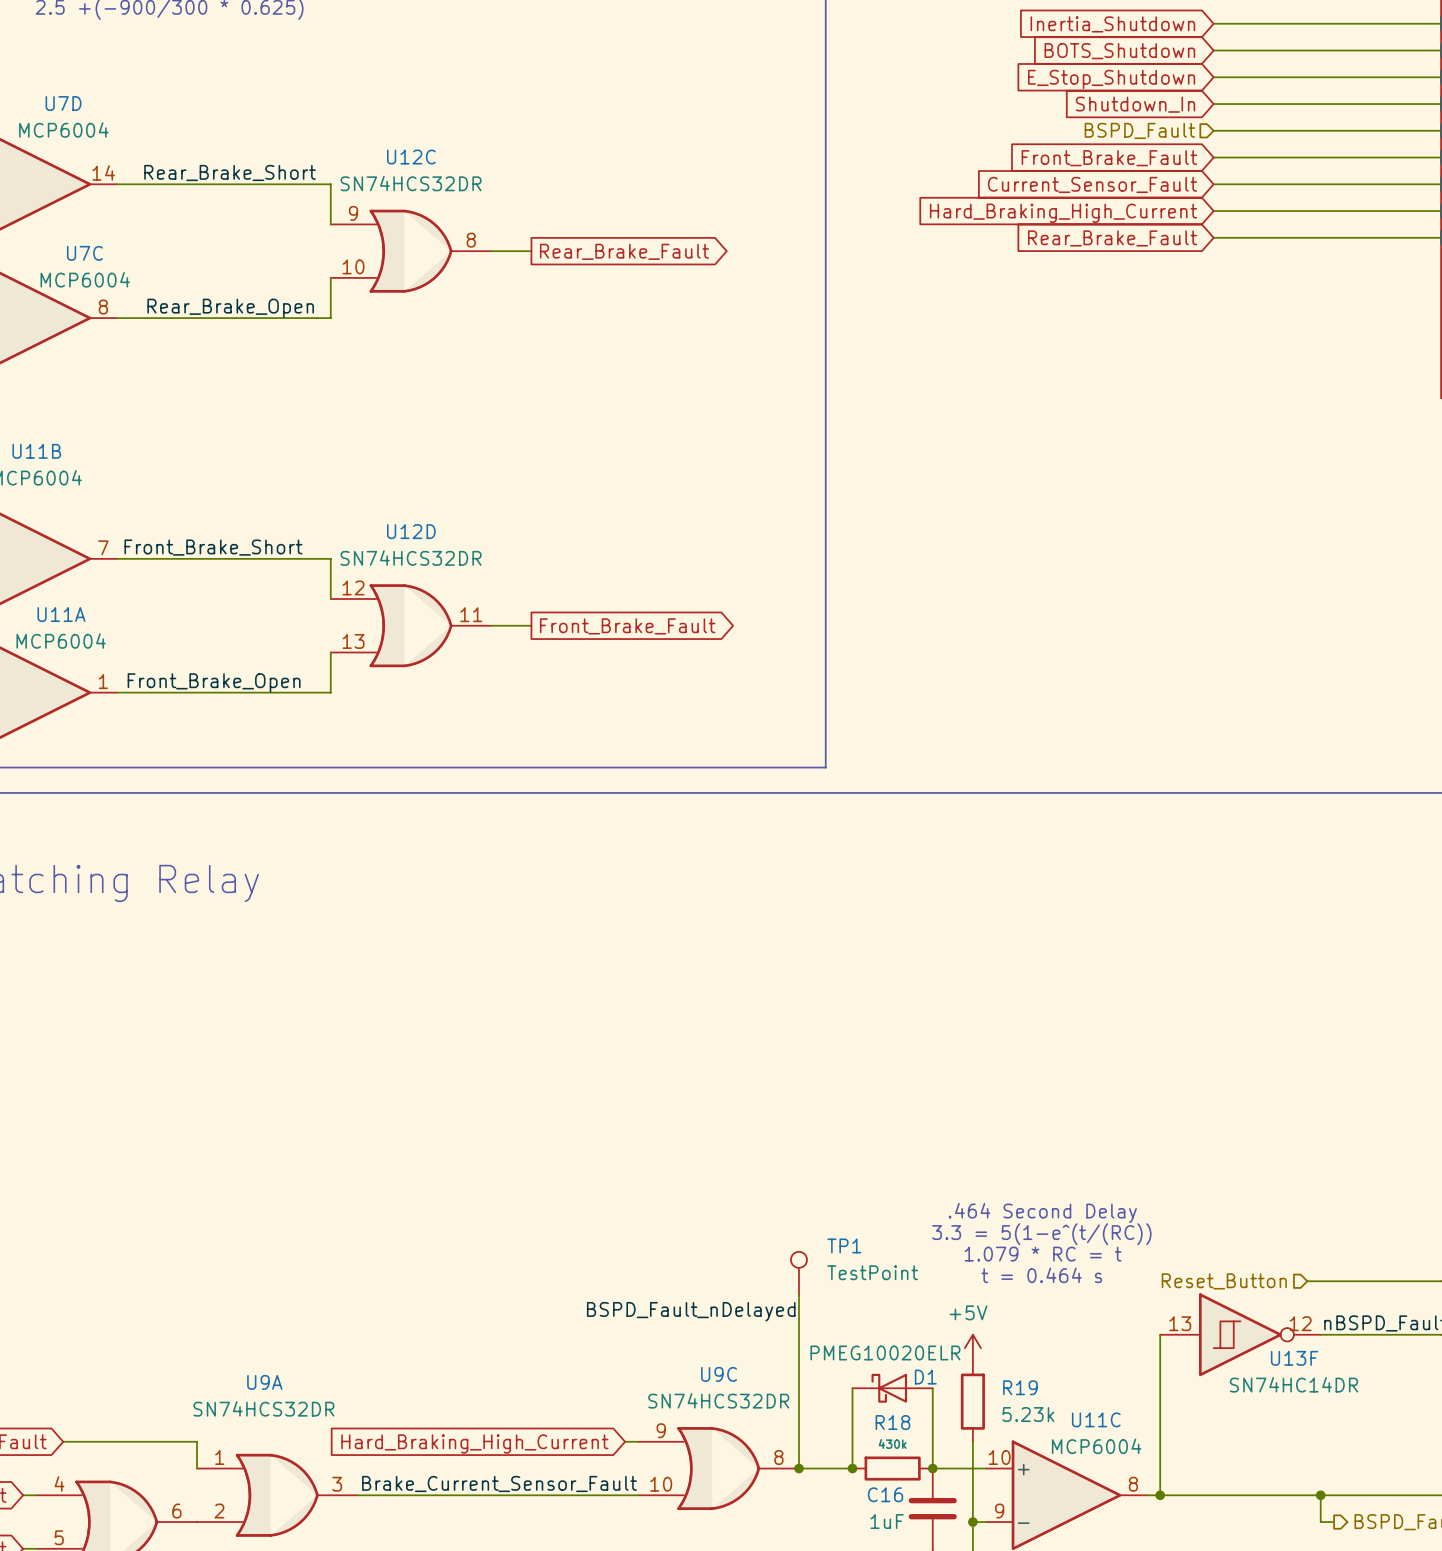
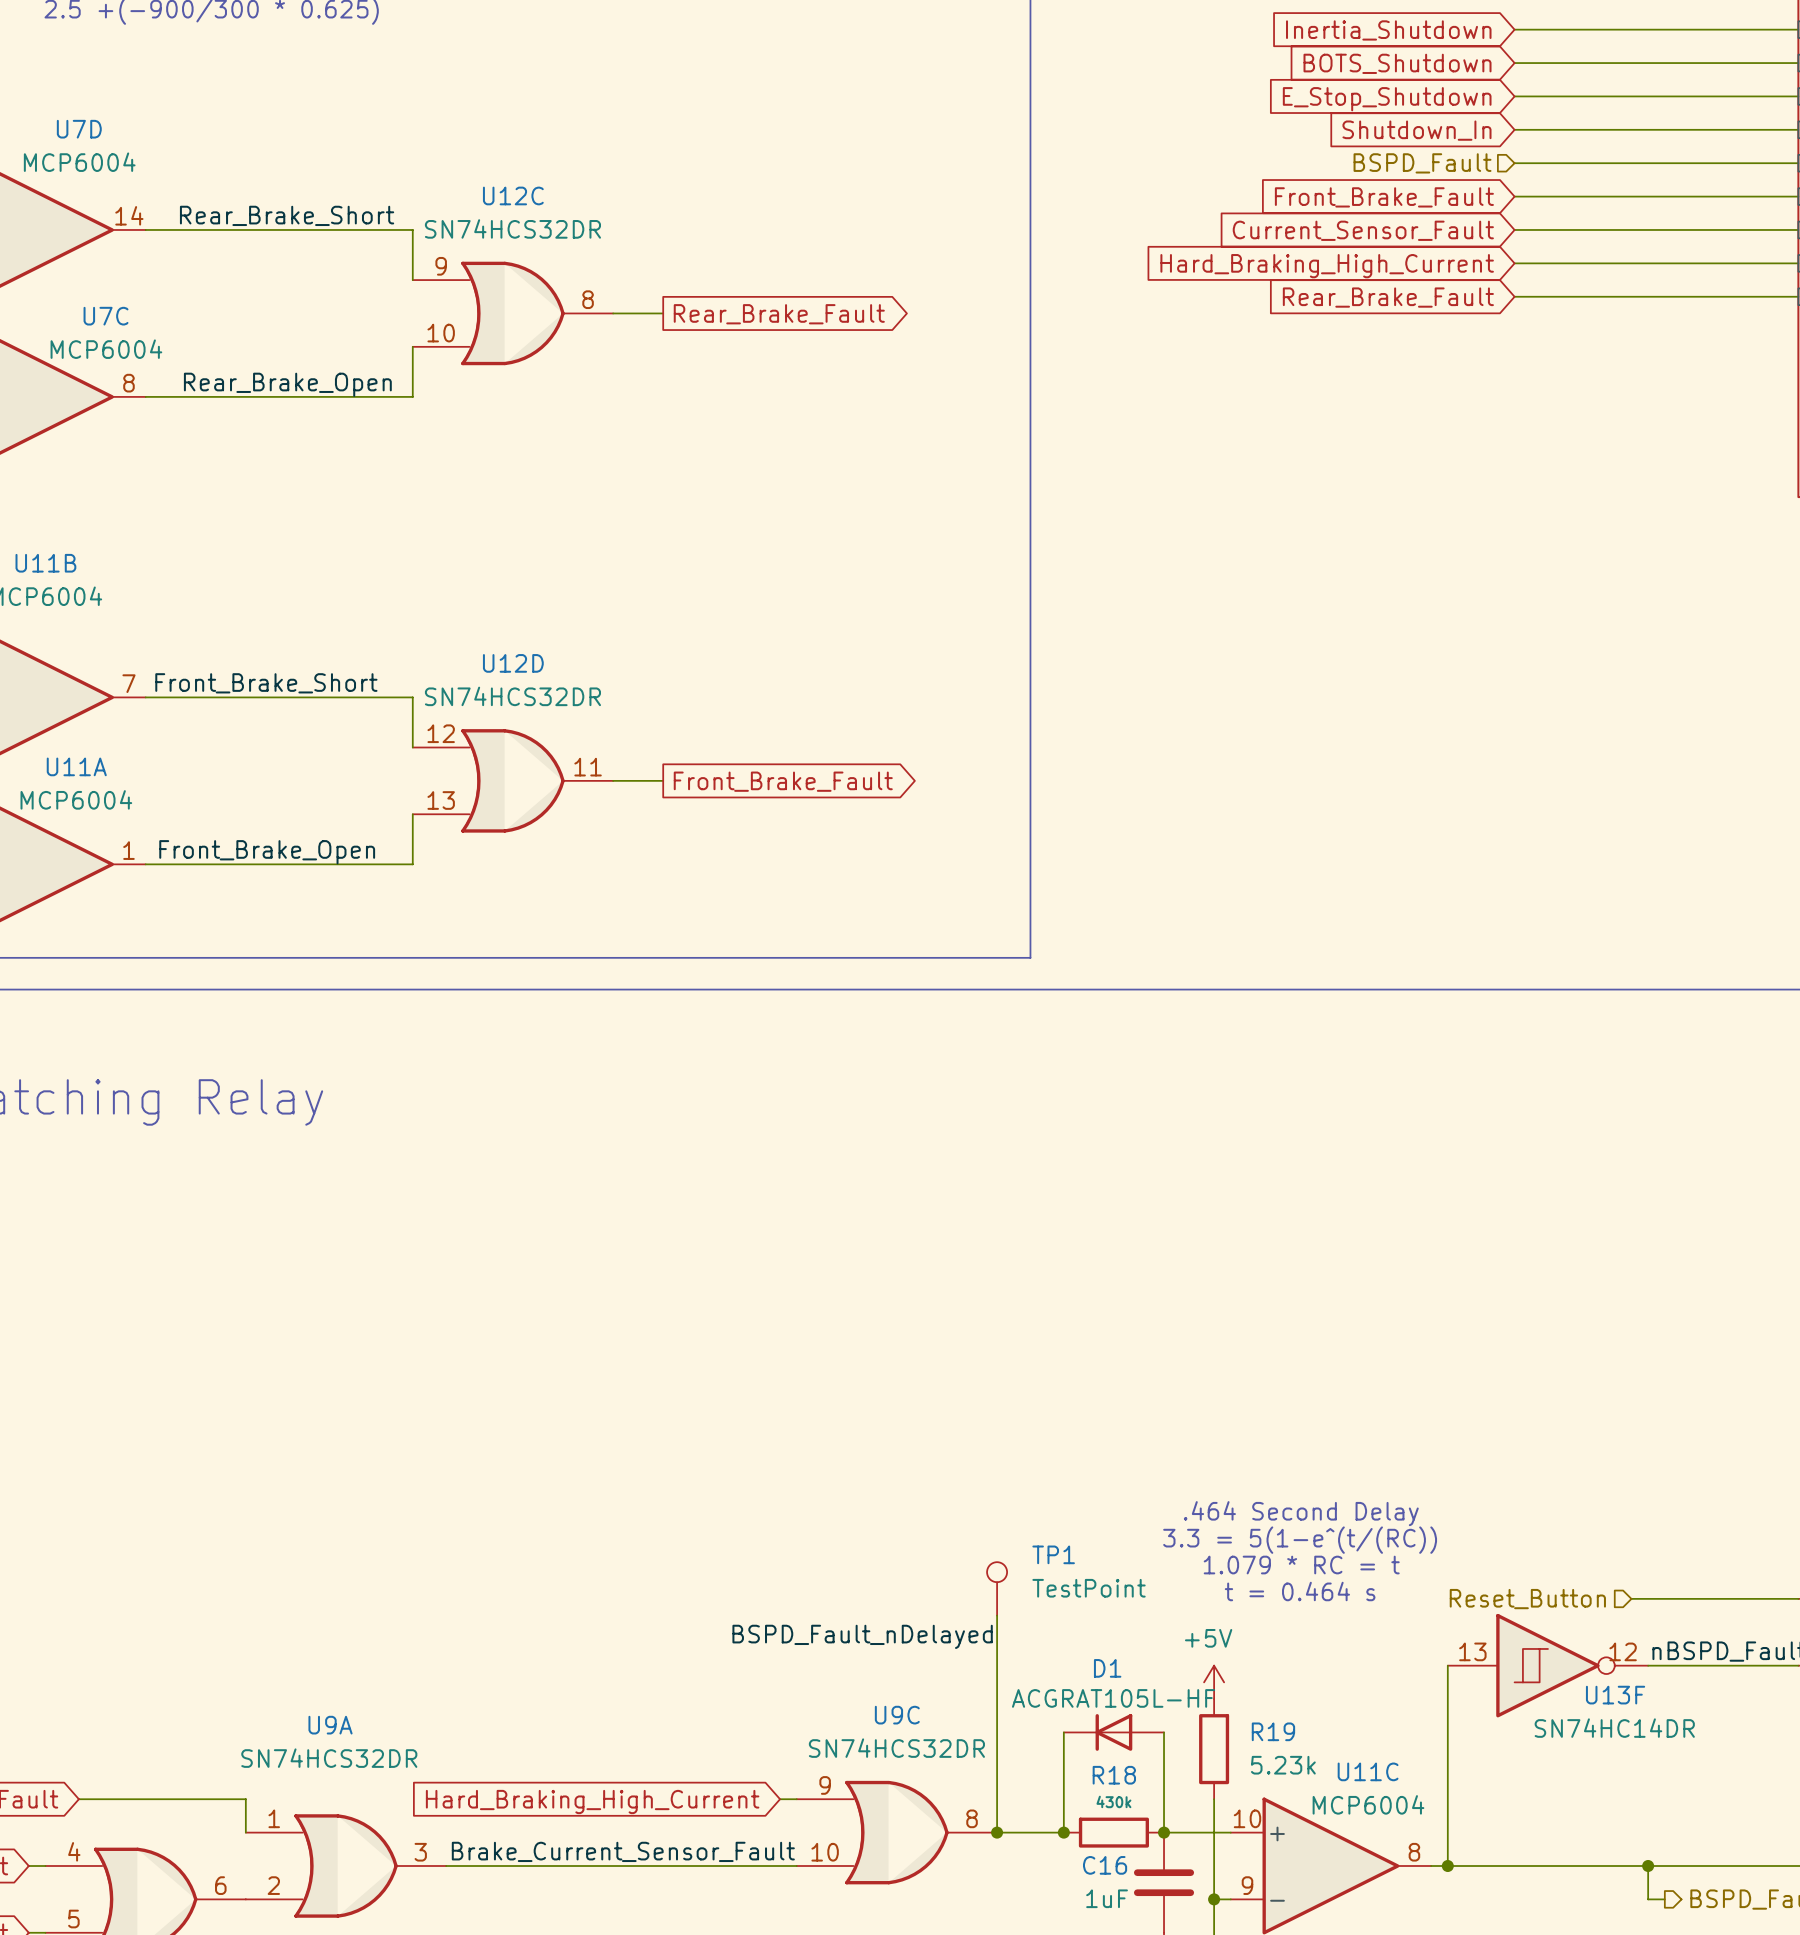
D1 value: PMEG10020ELR (885, 1352) -> ACGRAT105L-HF (1113, 1698)
D1 symbol: [852, 1373, 933, 1403] -> [1063, 1714, 1165, 1751]
D1 name position: D1 (925, 1377) -> D1 (1107, 1668)

